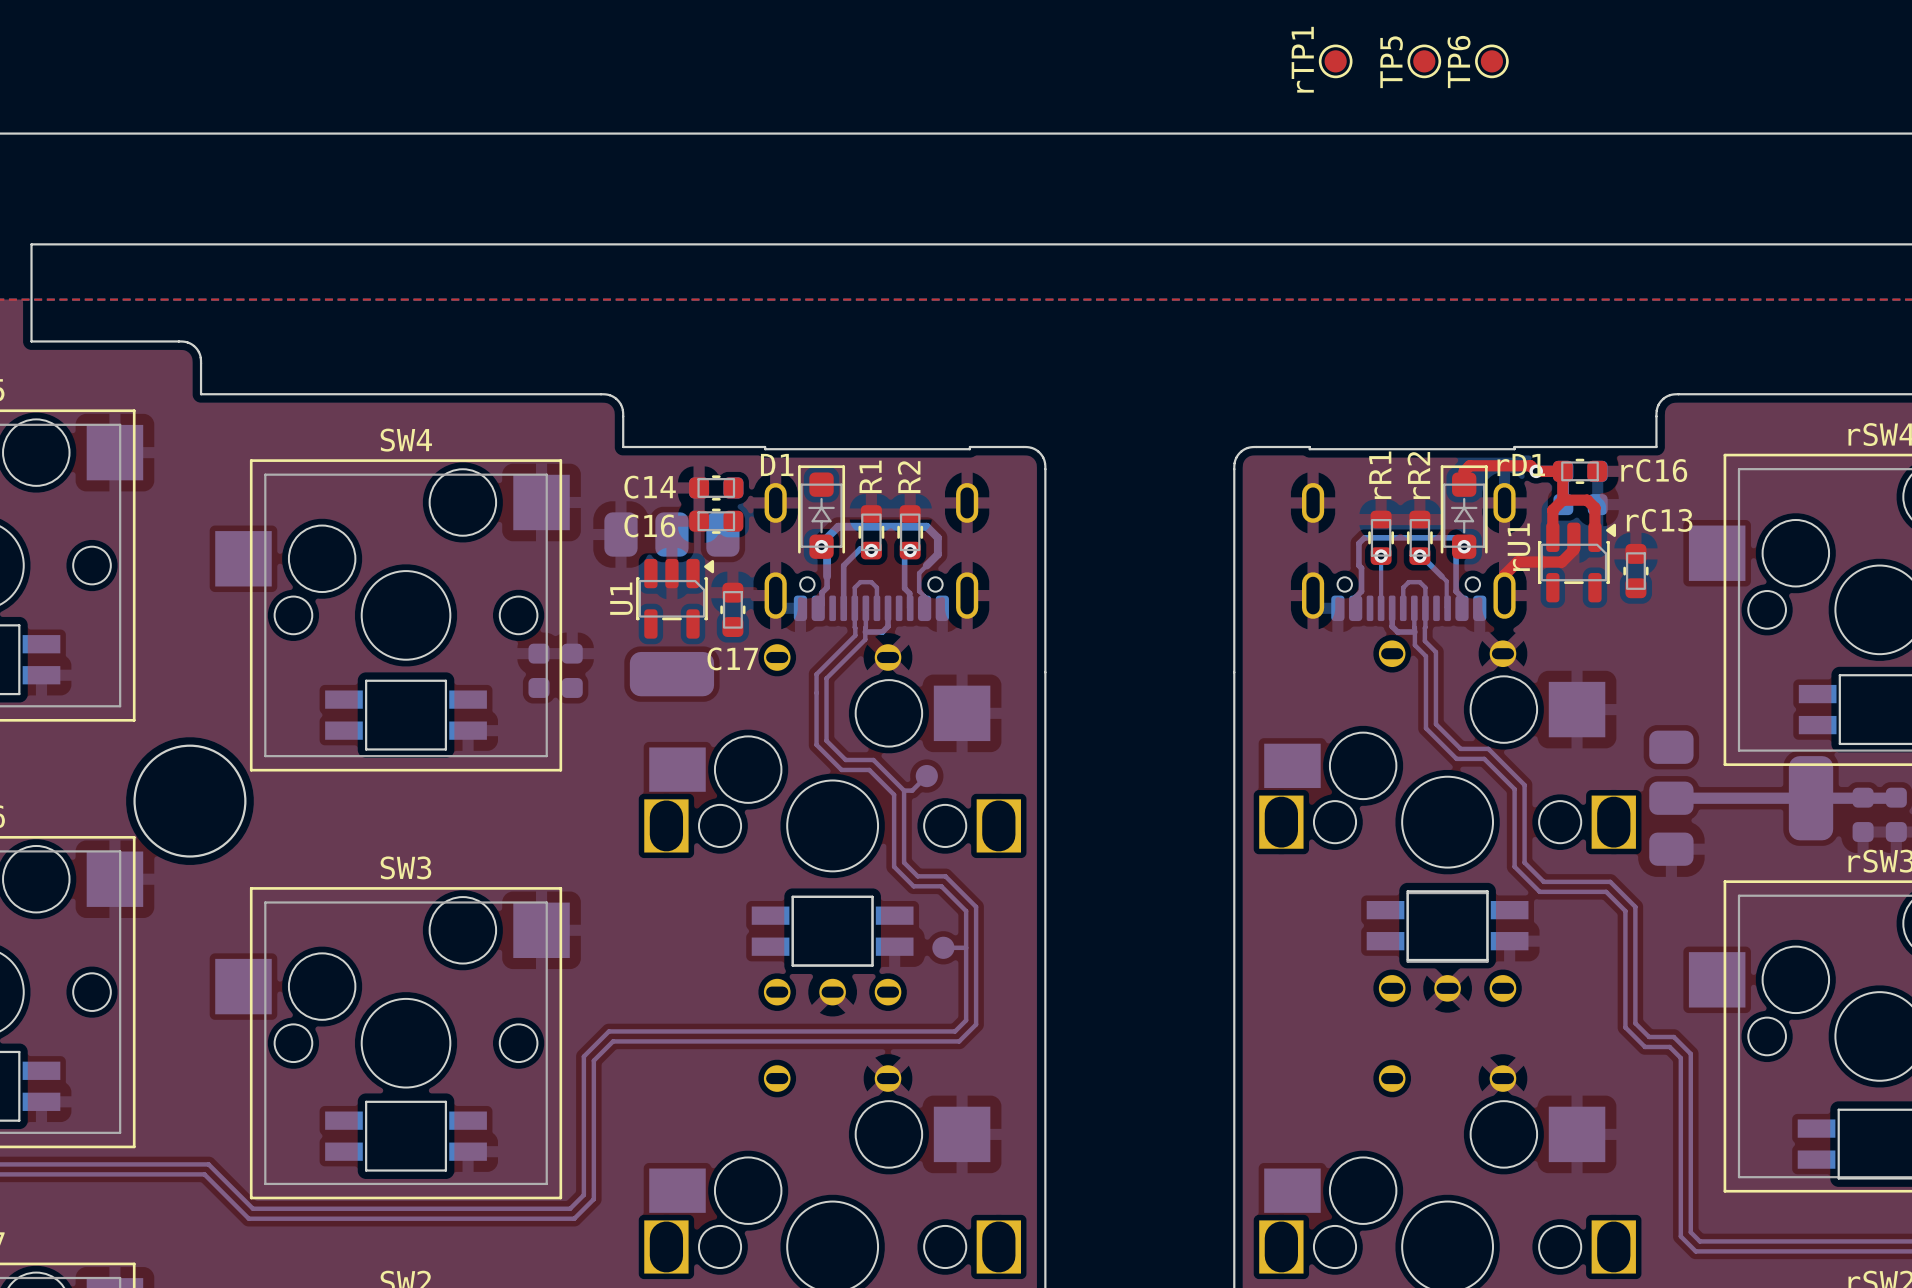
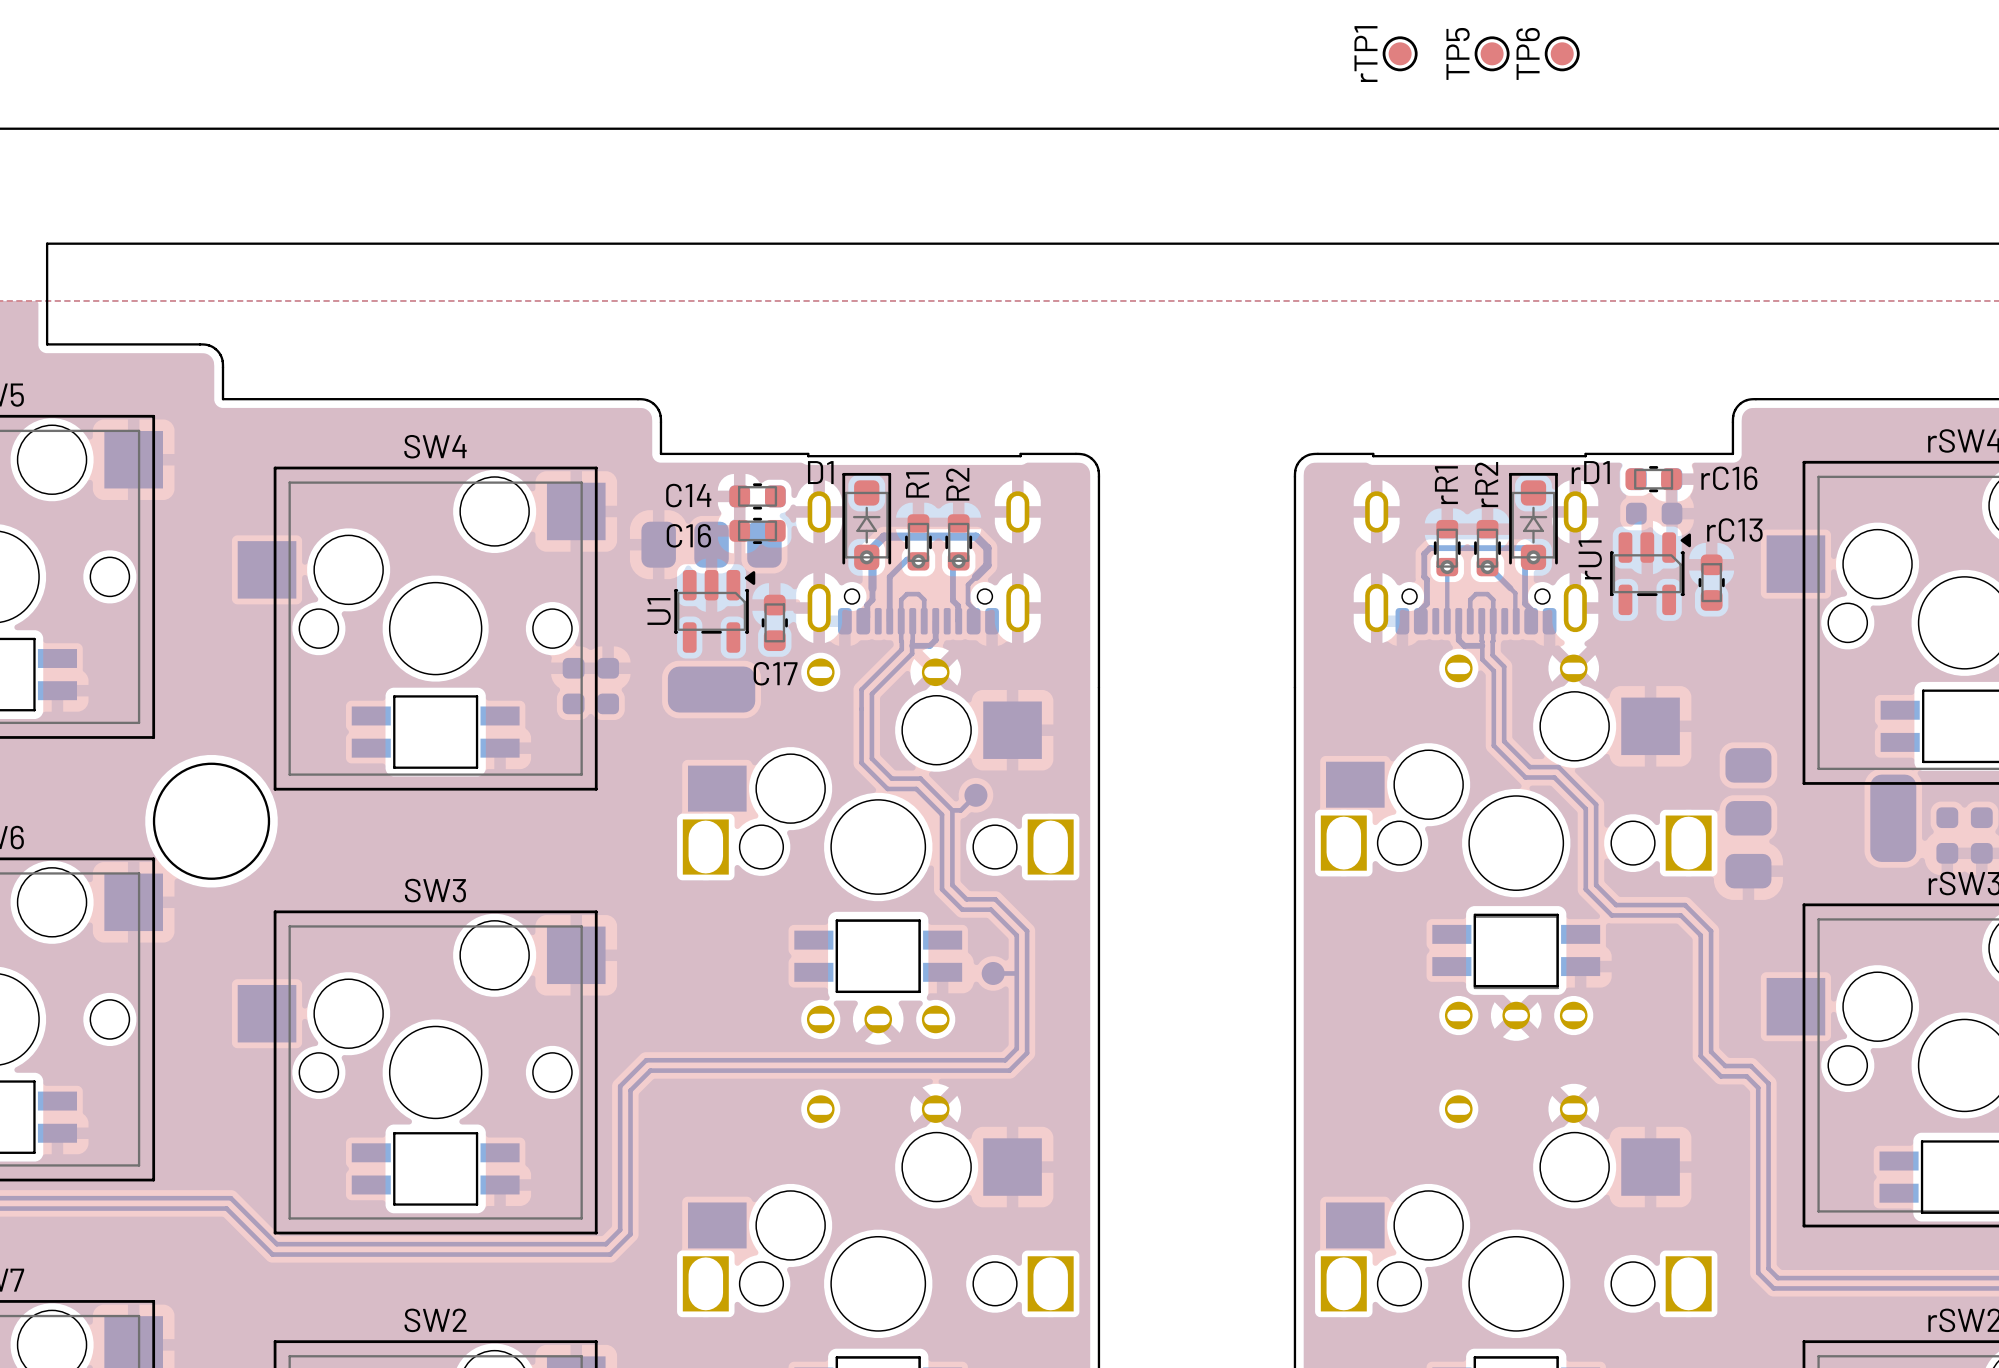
via: (1536, 471) -> none
top track: (1464, 484) (1464, 471) (1469, 465) (1530, 465) (1536, 471) (1562, 471) (1562, 500) -> none
top track: (1562, 500) (1587, 500) (1594, 507) (1594, 537) -> none
top track: (1562, 500) (1552, 510) (1552, 537) -> none
top track: (1573, 537) (1573, 549) (1561, 562) (1517, 562) (1504, 575) (1504, 595) -> none
bottom track: (1896, 797) (1671, 798) -> none

